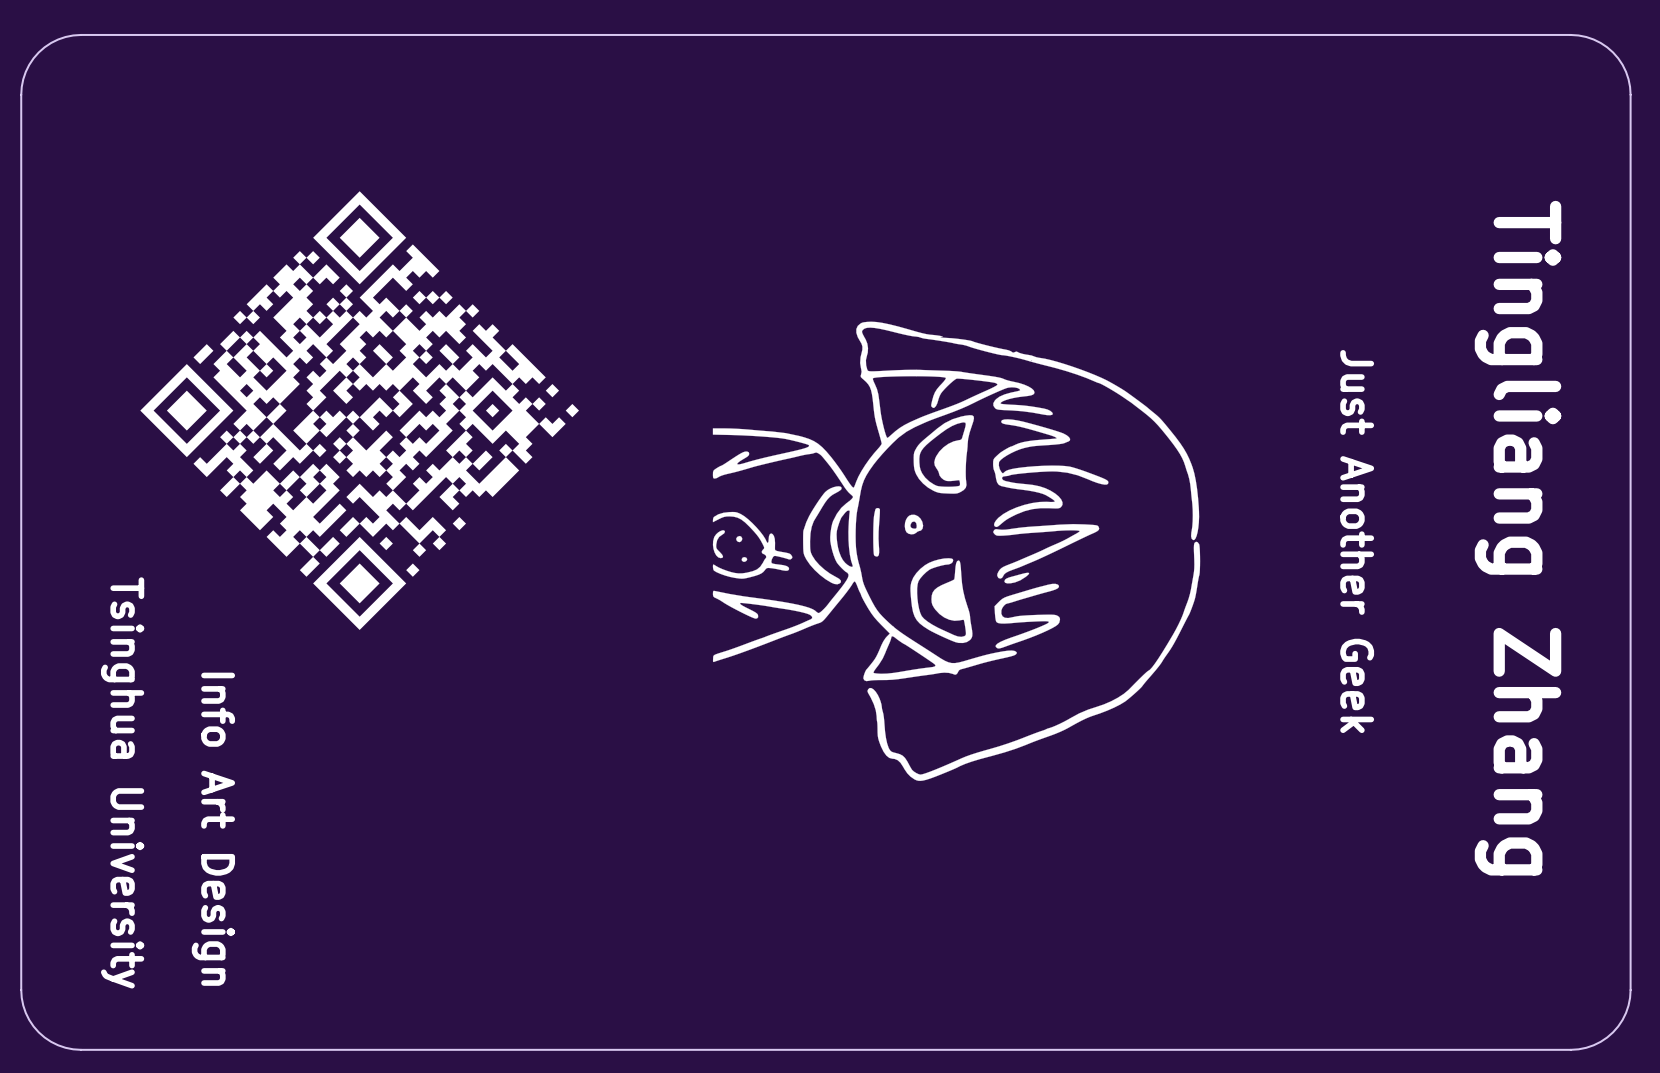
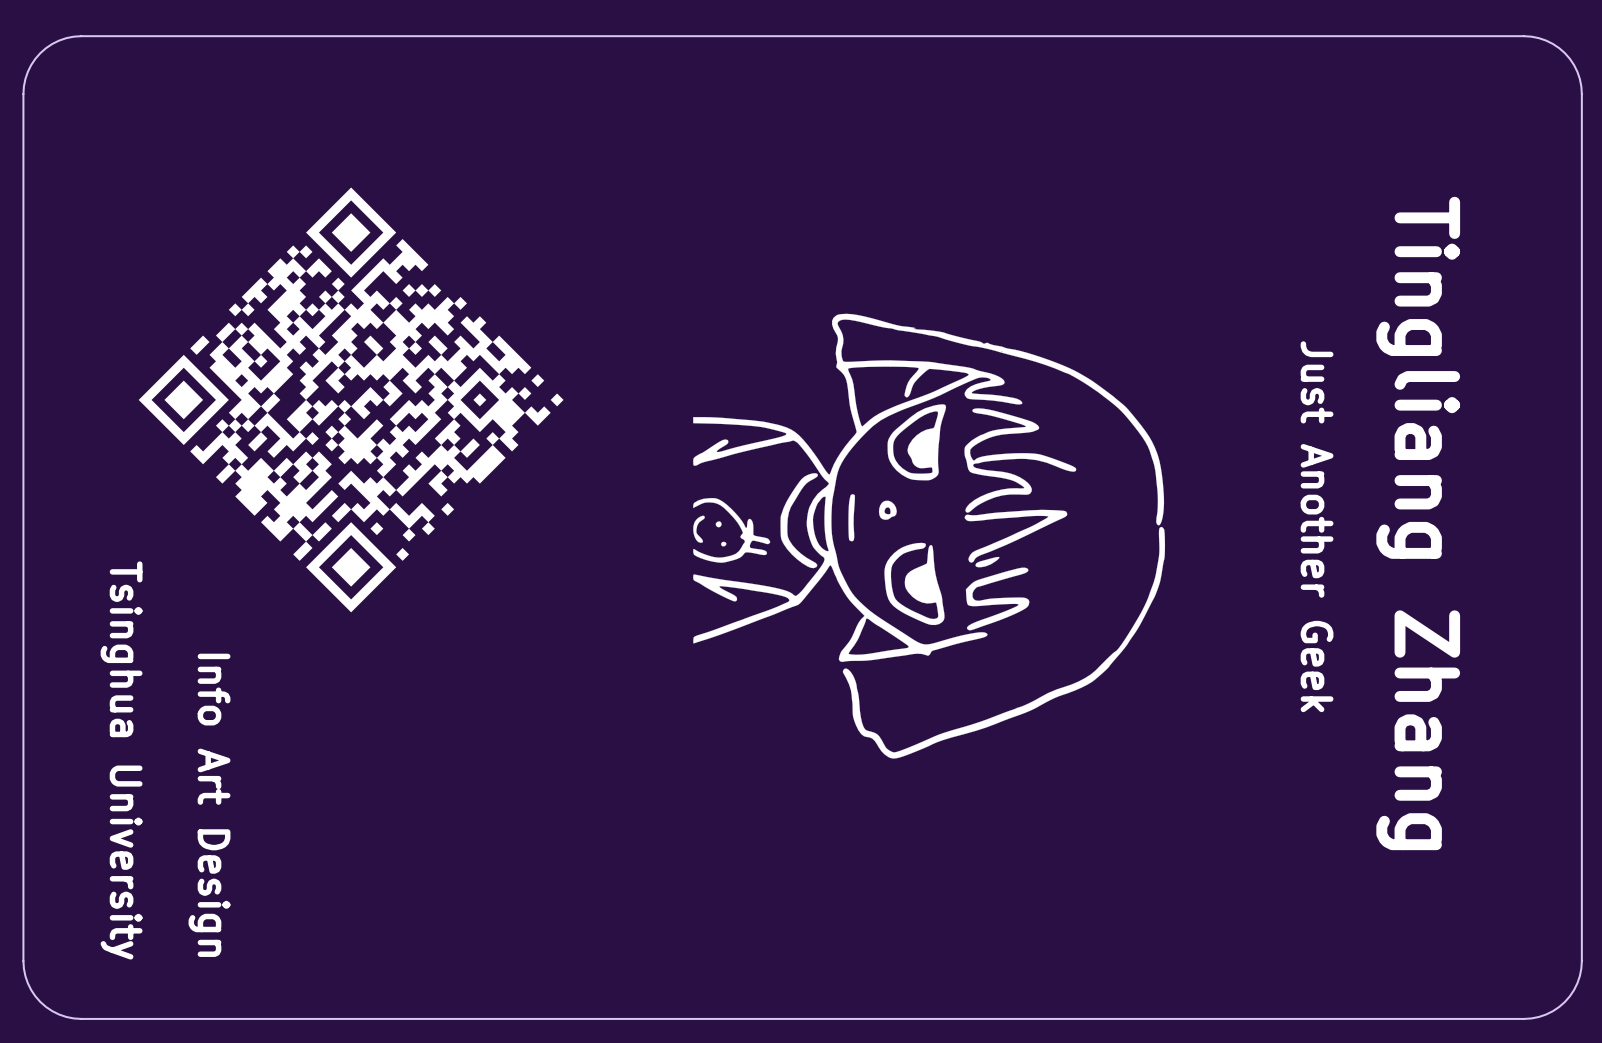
text position: Tingliang Zhang (1518, 538) -> Tingliang Zhang (1418, 523)

